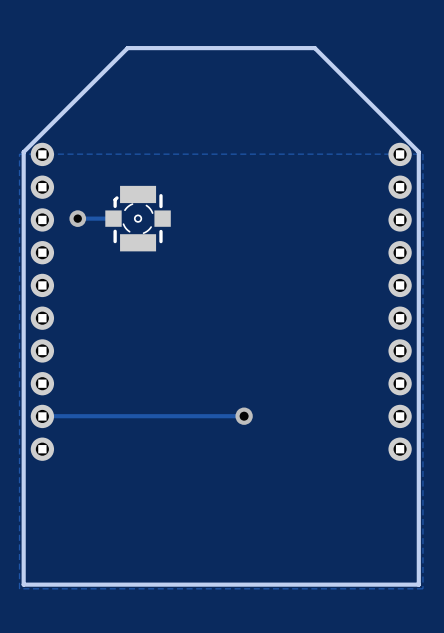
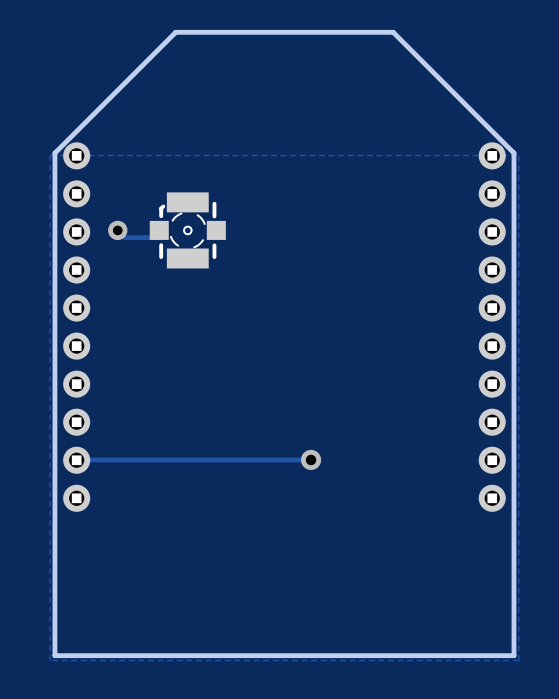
track: (77, 218) (113, 218) -> none
track: none -> (125, 237) (156, 237)

